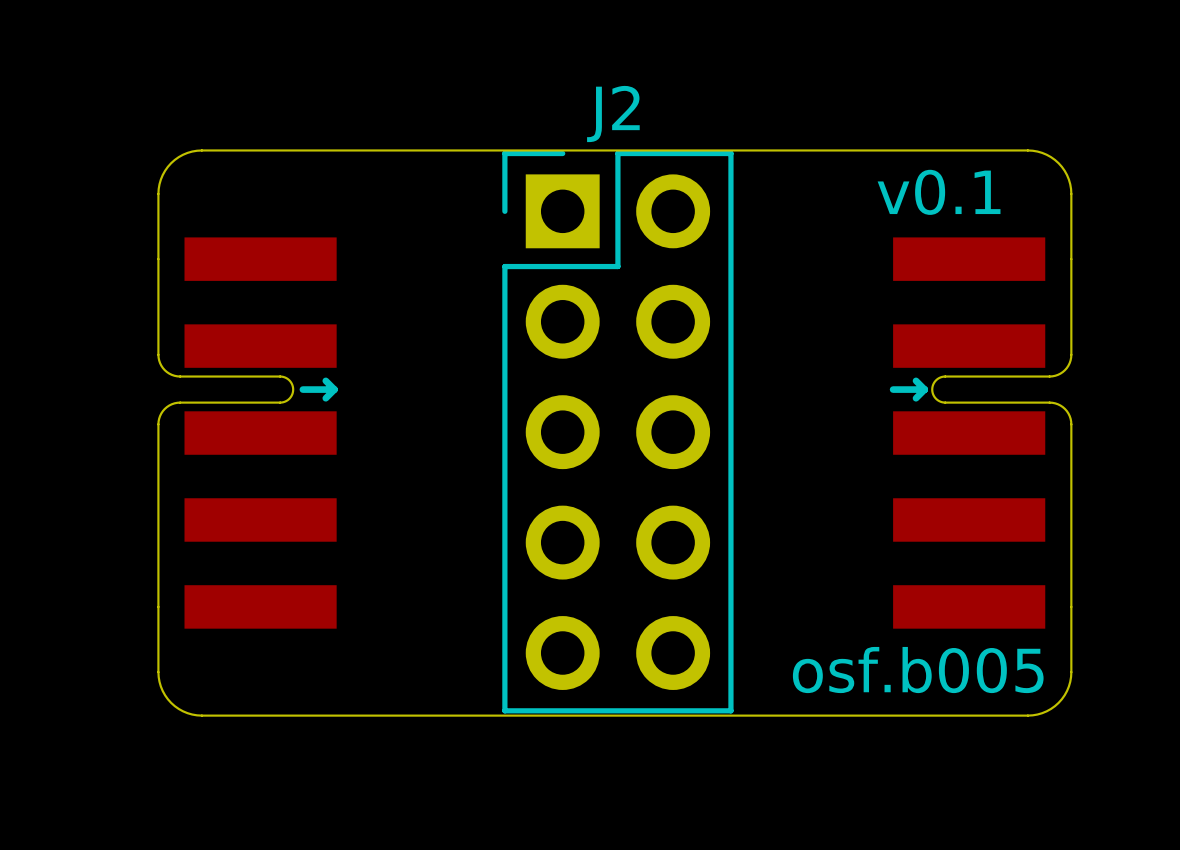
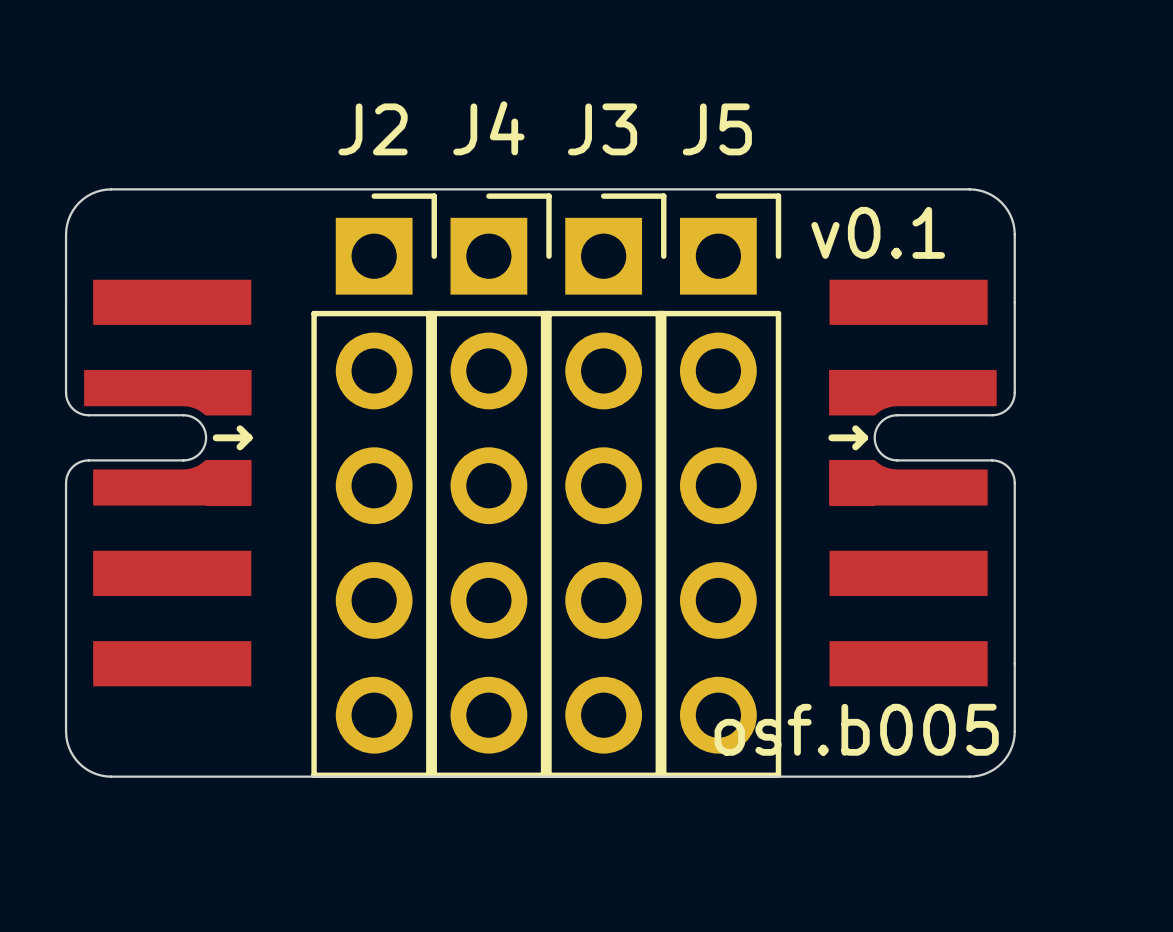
J2 footprint: [502, 150, 734, 714] -> [311, 193, 437, 779]
part footprint: [157, 237, 338, 629] -> [64, 279, 253, 687]
part footprint: [889, 237, 1073, 629] -> [828, 279, 1016, 687]
J4: none -> (488, 485)
J3: none -> (603, 485)
J5: none -> (718, 485)

